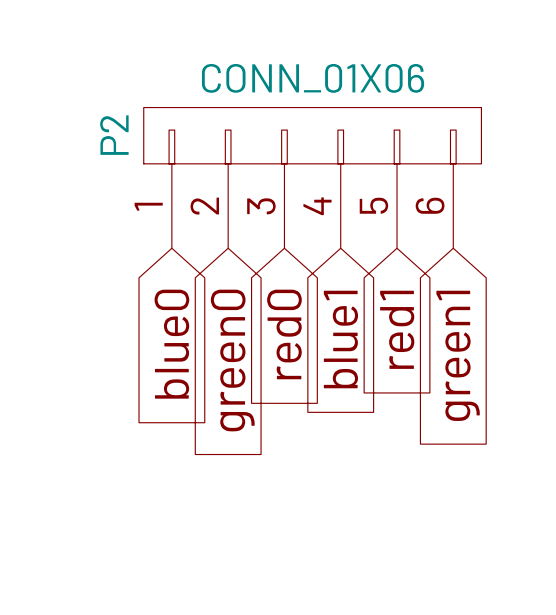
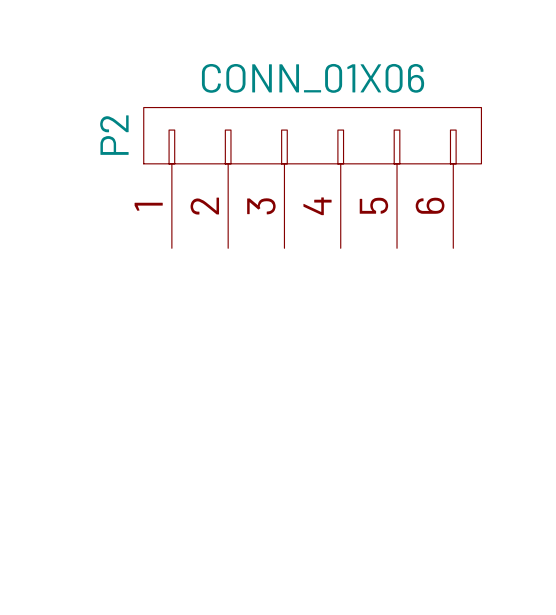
global label: red1 (397, 329) -> none
global label: red0 (284, 334) -> none
global label: blue1 (340, 339) -> none
global label: blue0 (171, 344) -> none
global label: green1 (458, 355) -> none
global label: green0 (232, 360) -> none

